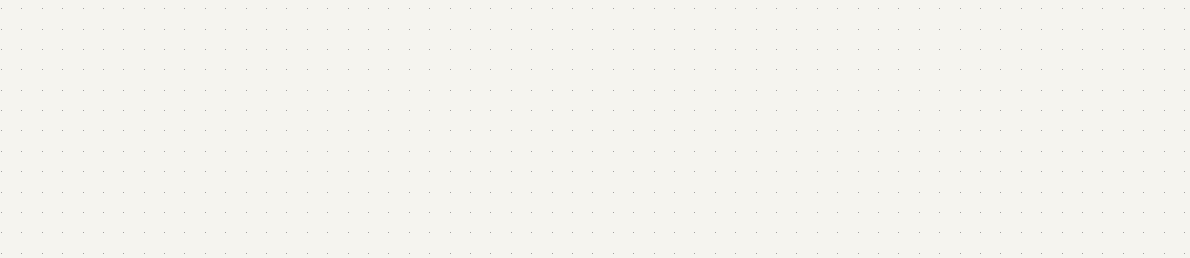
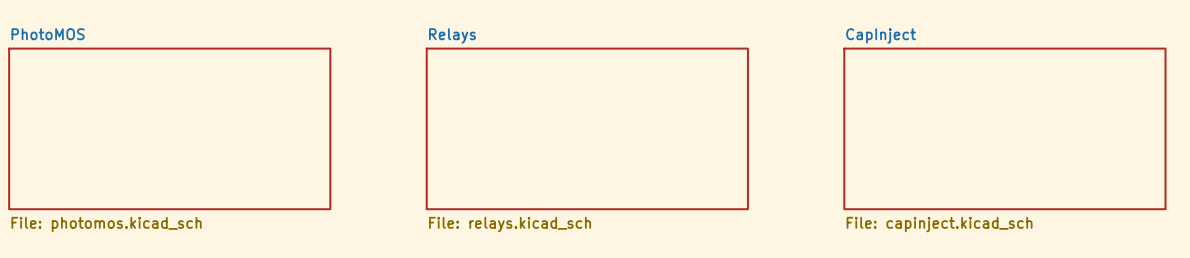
sheet PhotoMOS: none -> File: photomos.kicad_sch (169, 128)
sheet Relays: none -> File: relays.kicad_sch (587, 128)
sheet CapInject: none -> File: capinject.kicad_sch (1004, 128)

